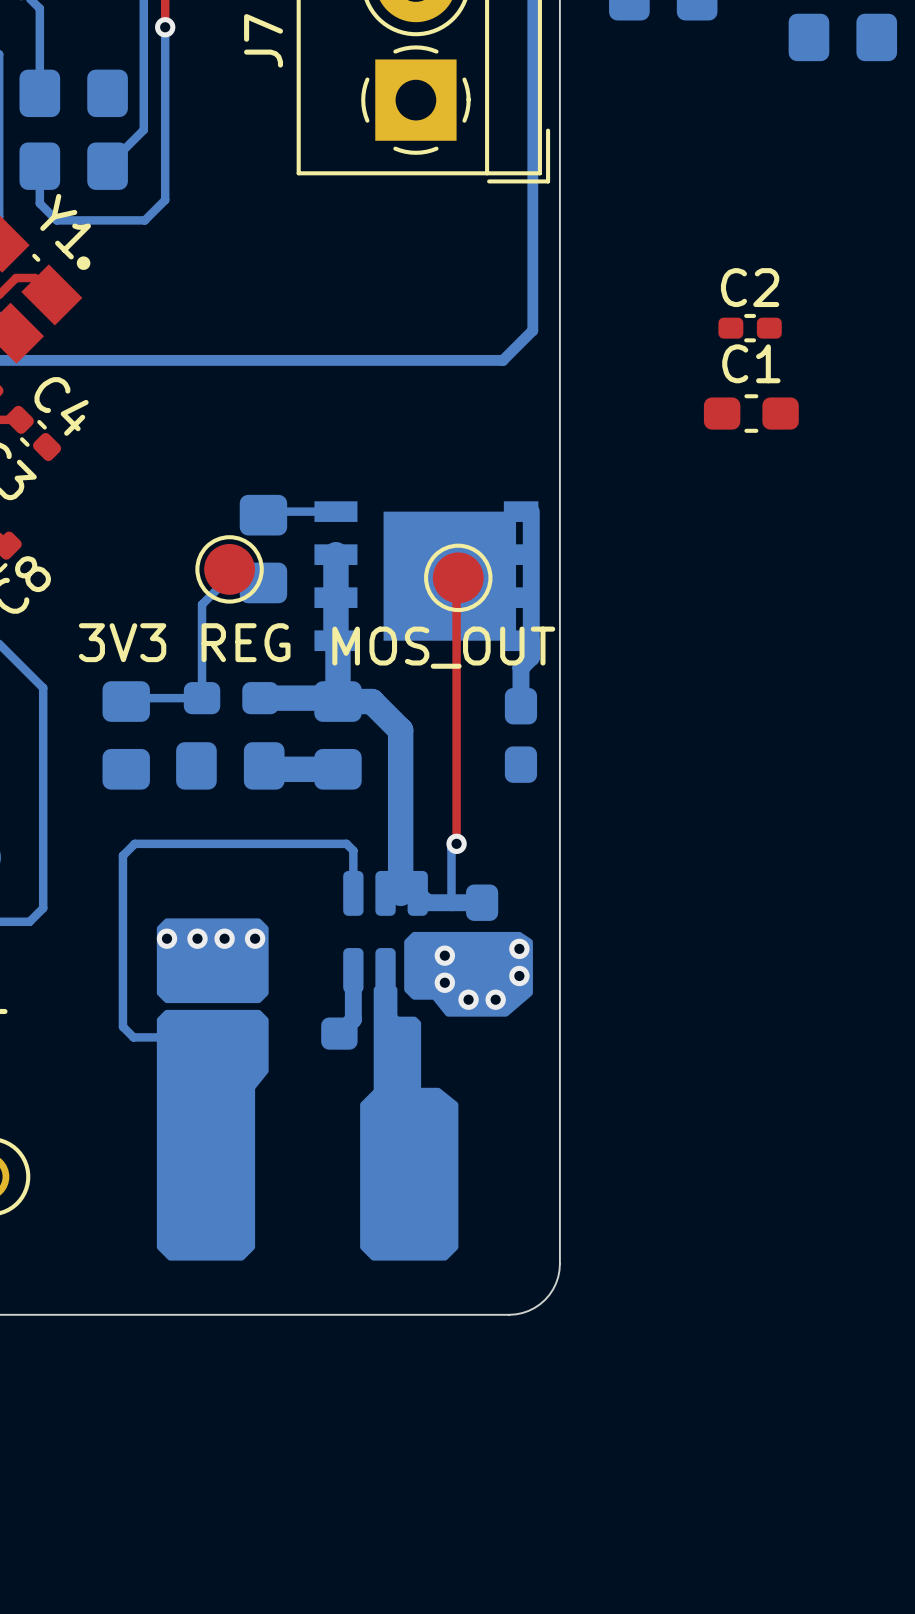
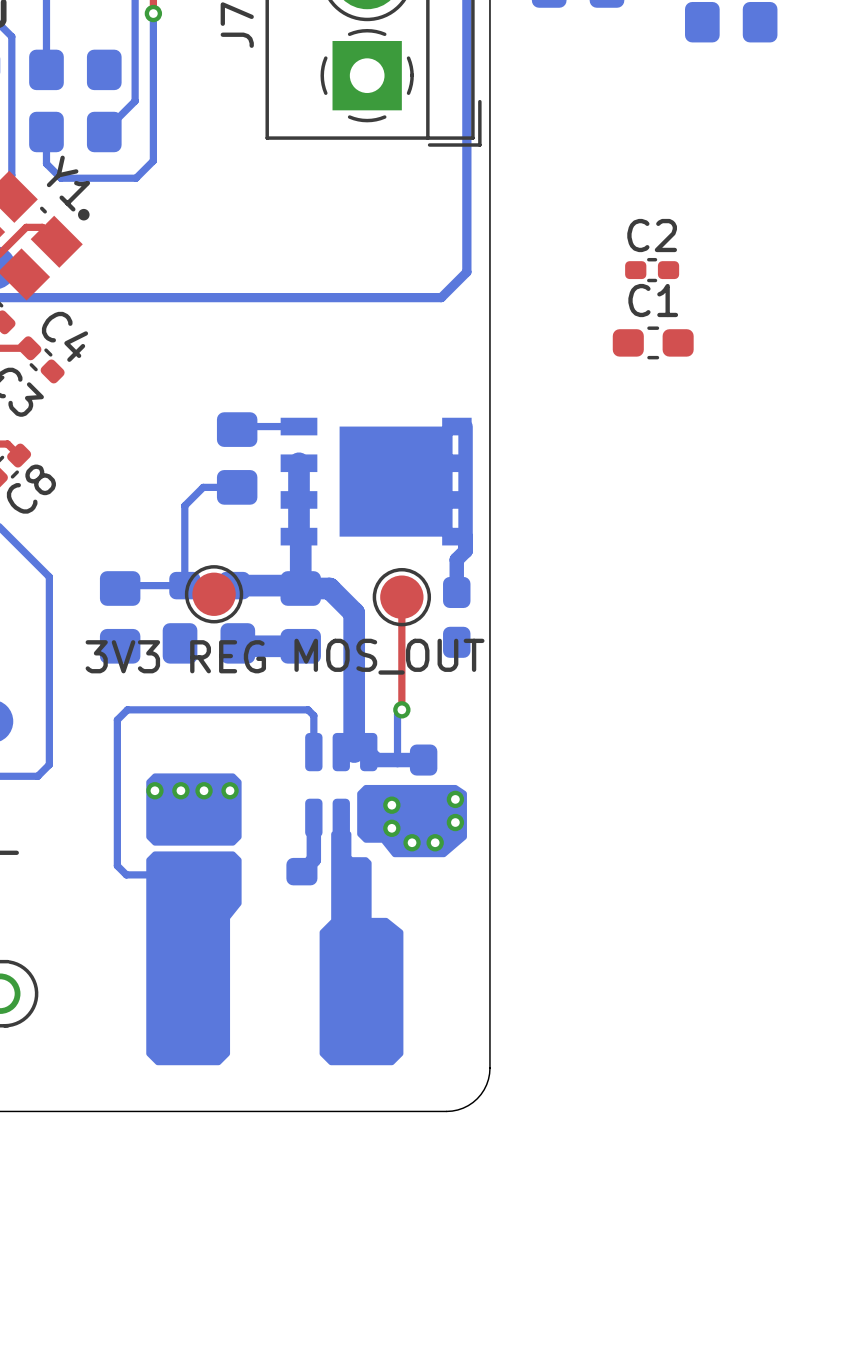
3V3 REG position: (229, 569) -> (214, 594)
top track: (458, 577) (456, 579) (456, 711) -> none
MOS_OUT position: (458, 577) -> (401, 597)

